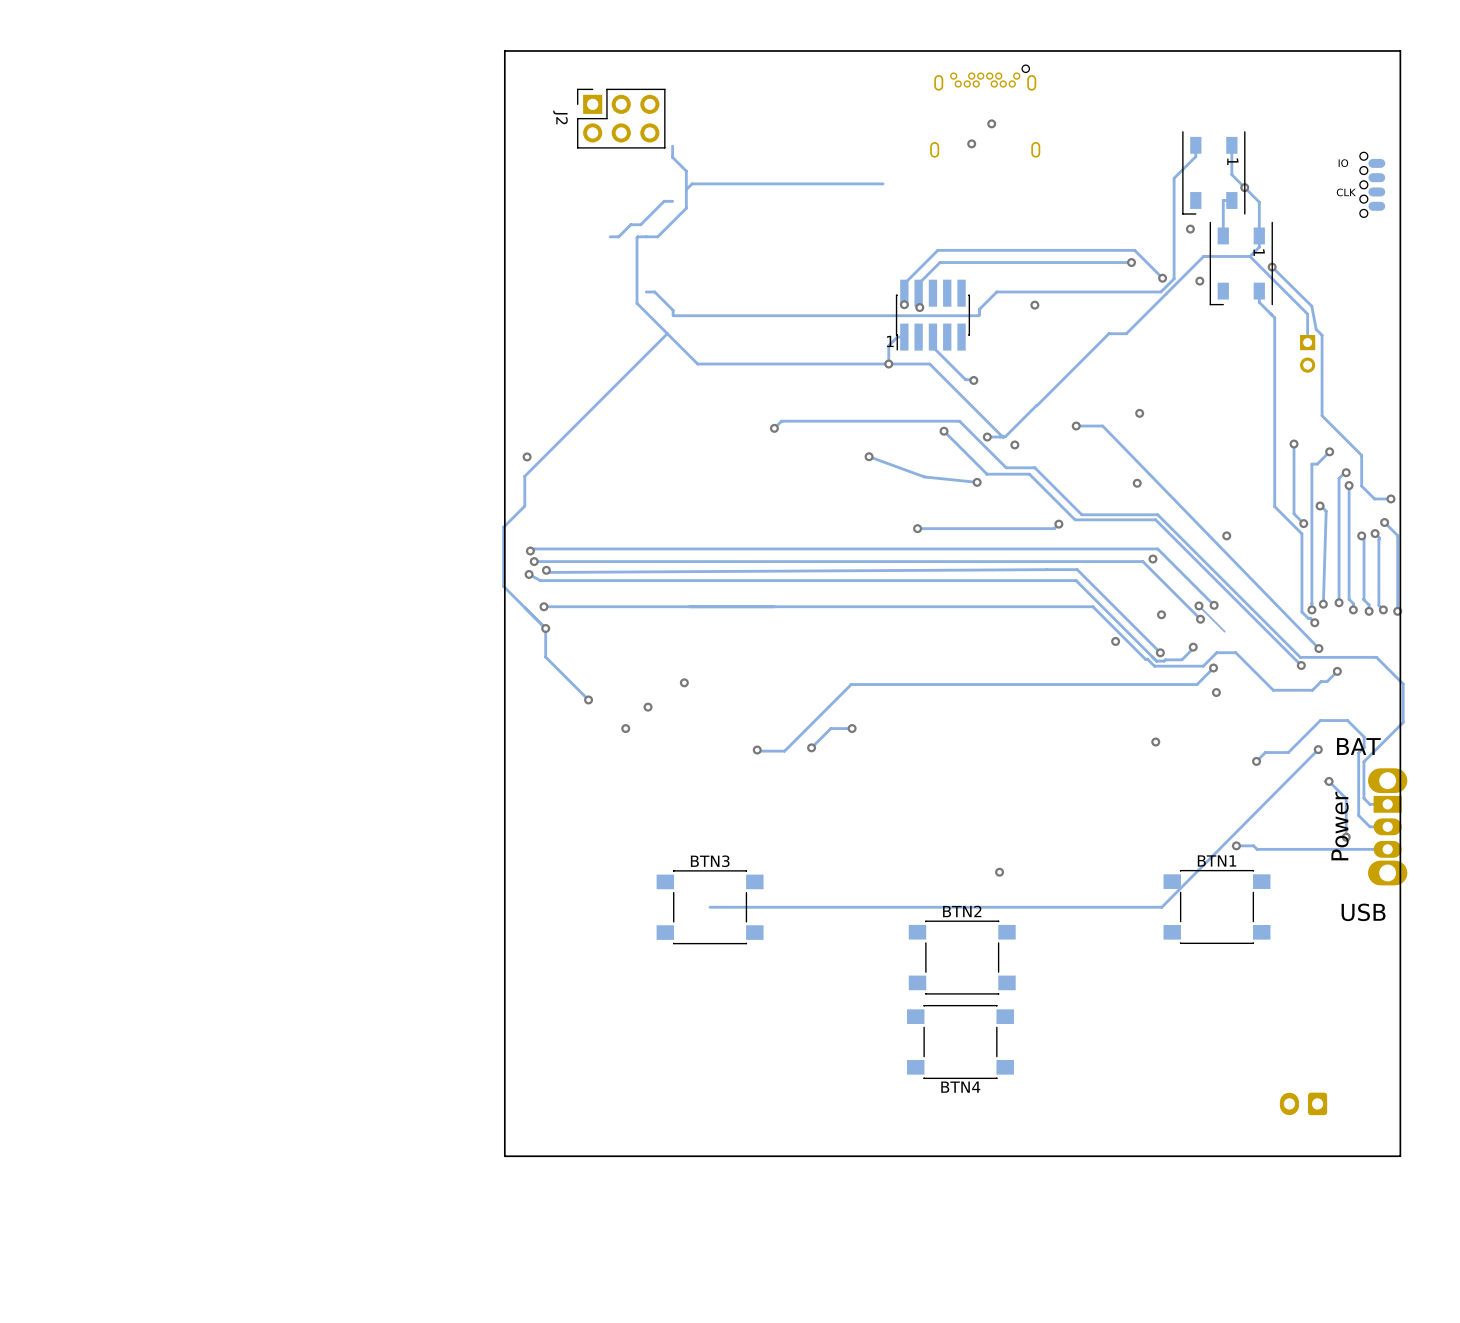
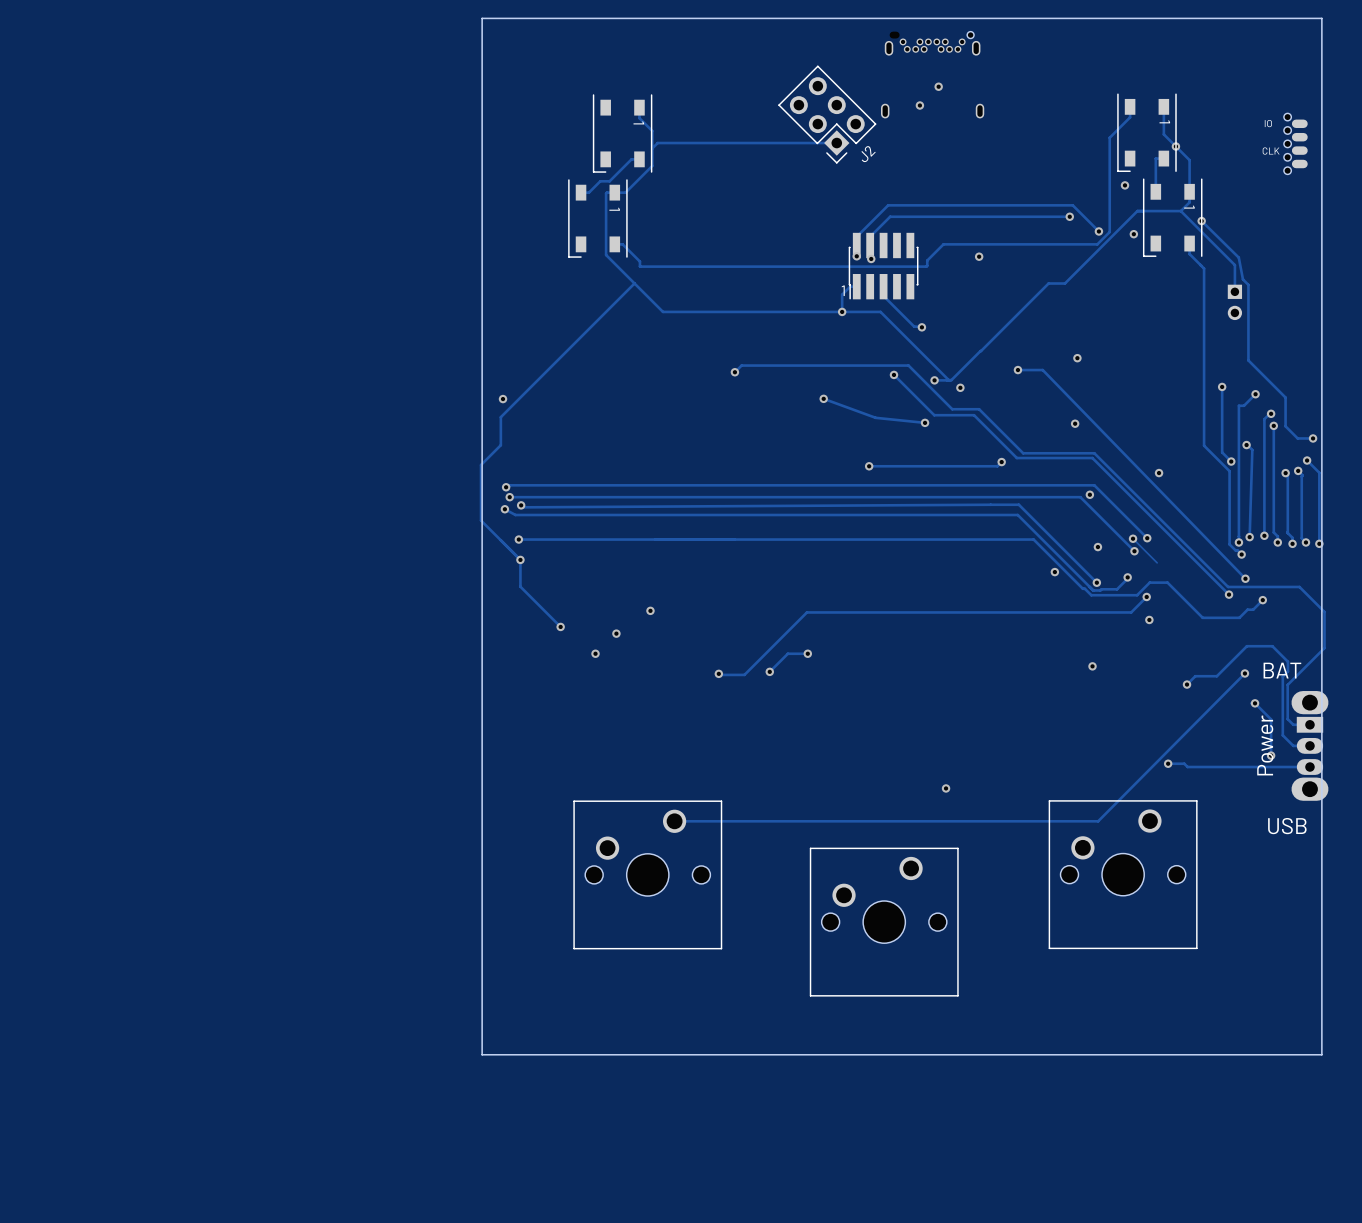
J2 rotation: 0° (621, 118) -> 135° counterclockwise (827, 114)
J2 position: (621, 118) -> (827, 114)
part: none -> (622, 133)
part: none -> (597, 218)
BTN1: (1216, 906) -> none
BTN3: (710, 907) -> none
BTN2: (962, 957) -> none
part: none -> (647, 874)
part: none -> (1123, 874)
part: none -> (884, 922)
BTN4: (960, 1041) -> none
part: (1303, 1103) -> none

